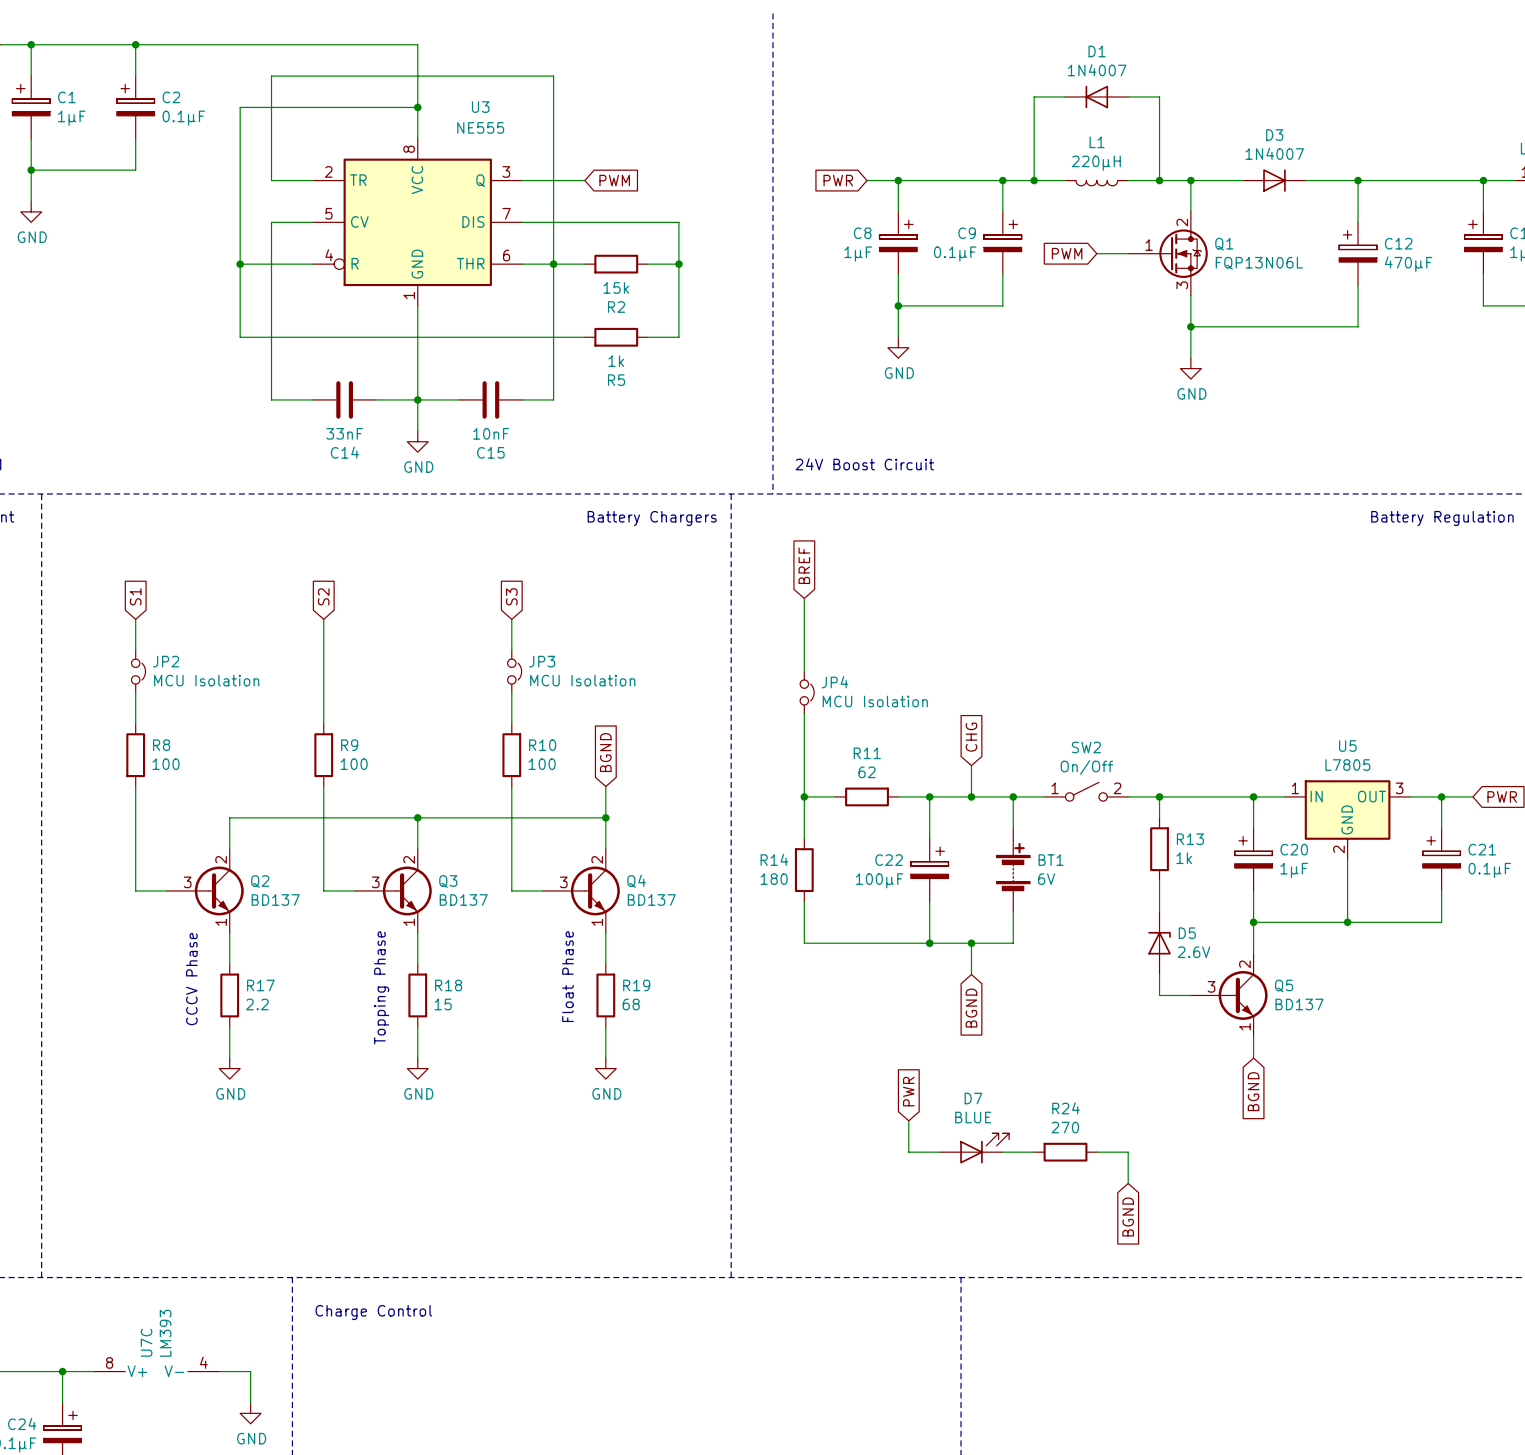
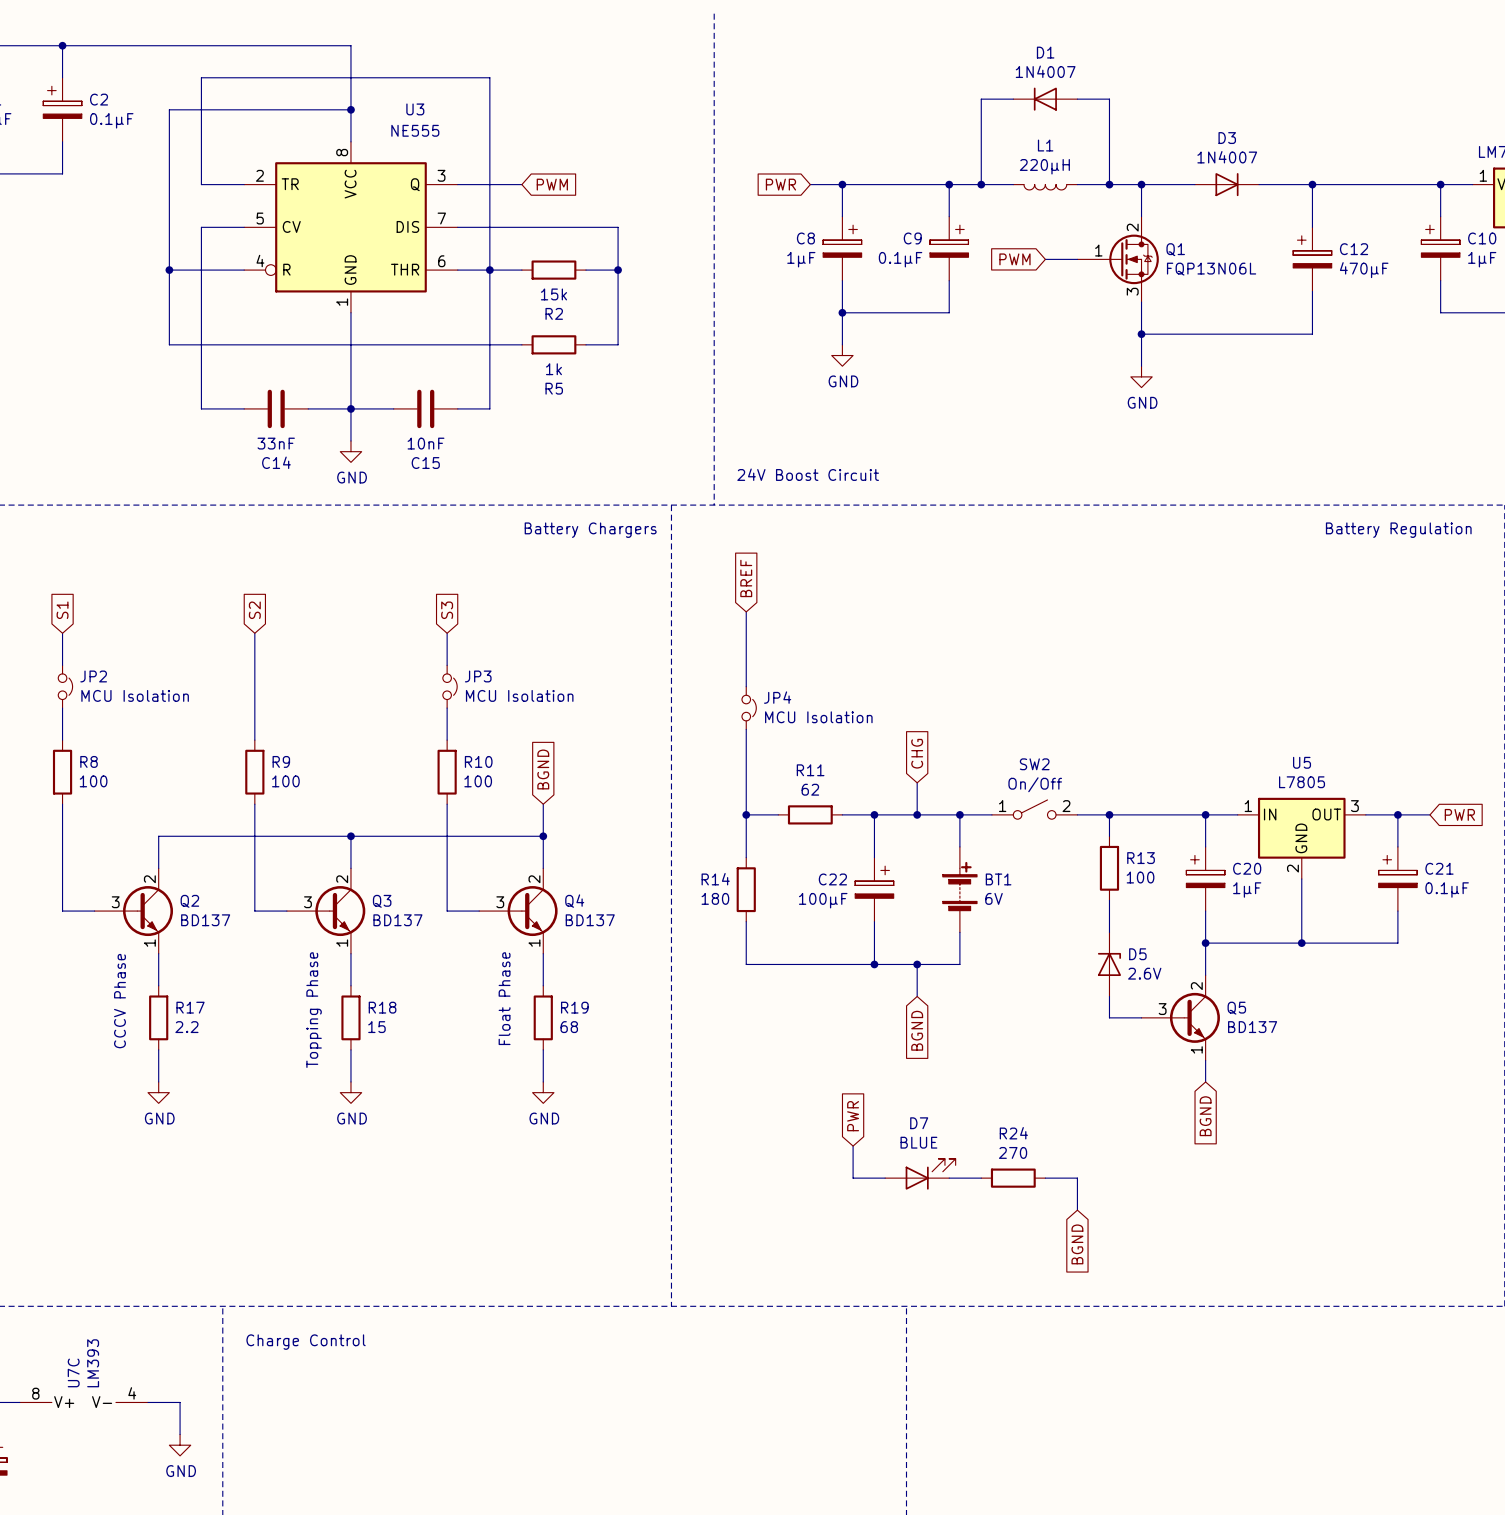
R13 value: 1k (1184, 858) -> 100 (1140, 877)

